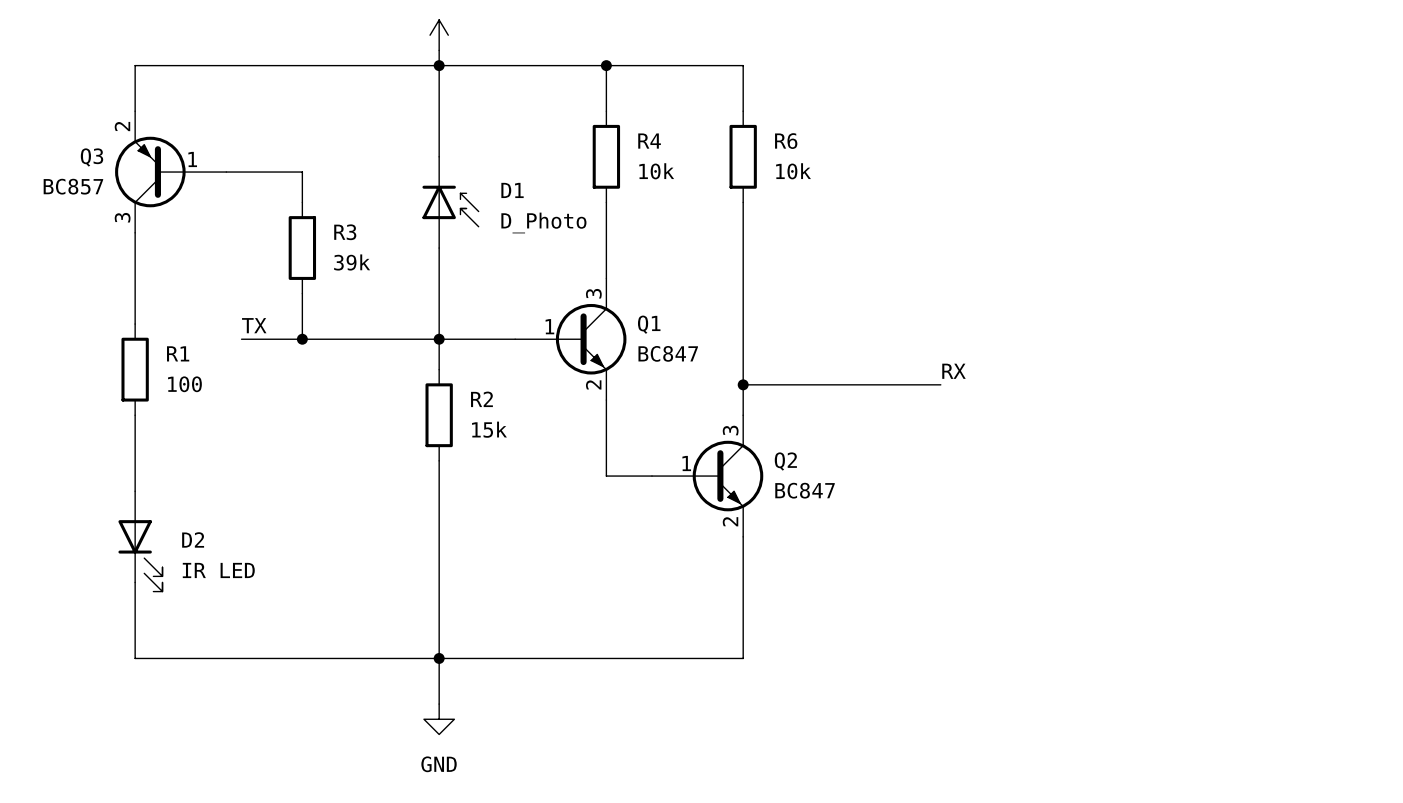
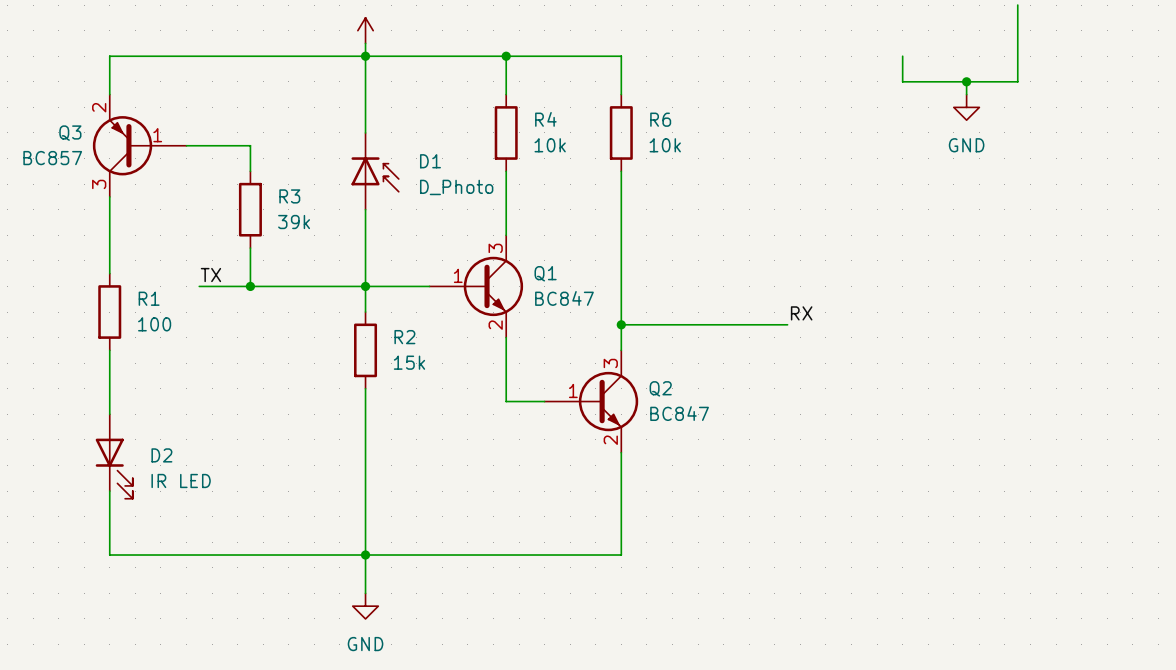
wire: none -> (1017, 5) (1017, 81) (902, 81) (902, 56)
wire: none -> (966, 81) (966, 94)
junction: none -> (966, 81)
power symbol: none -> GND (966, 107)

